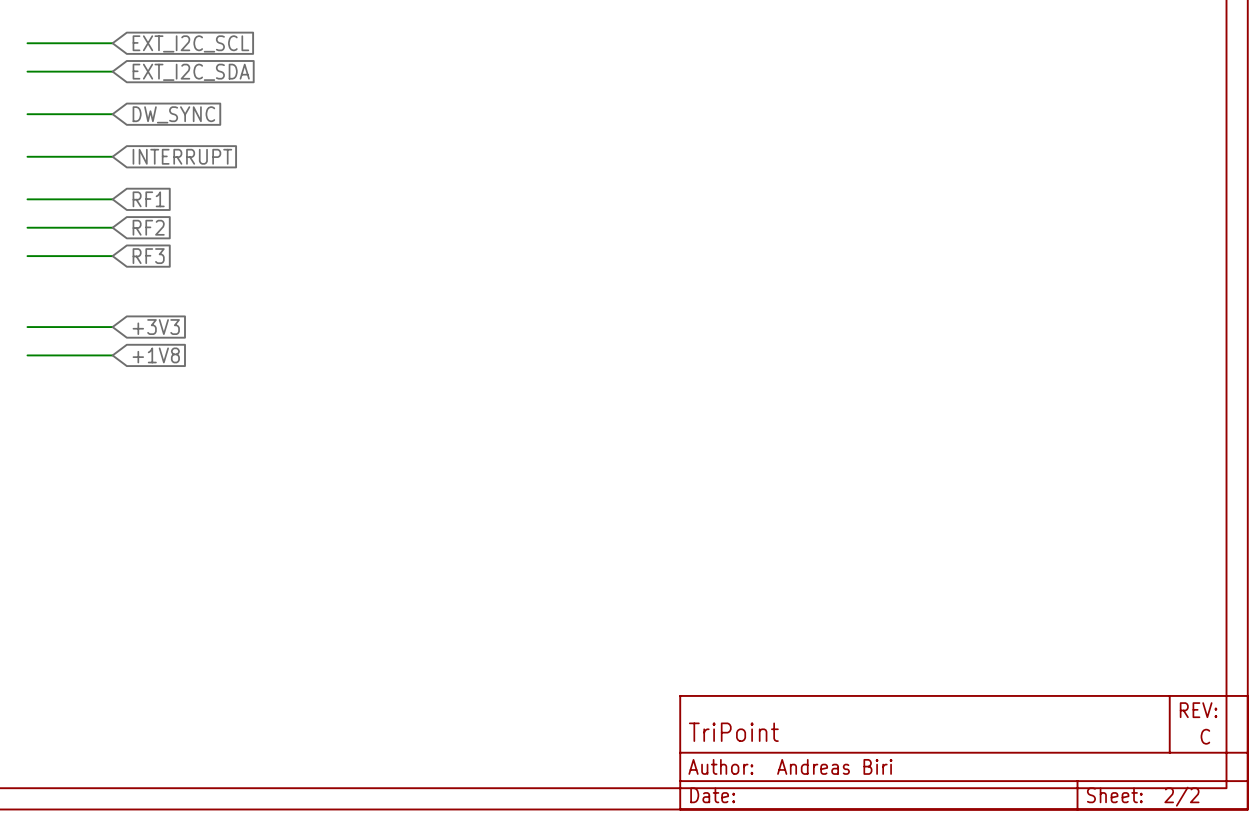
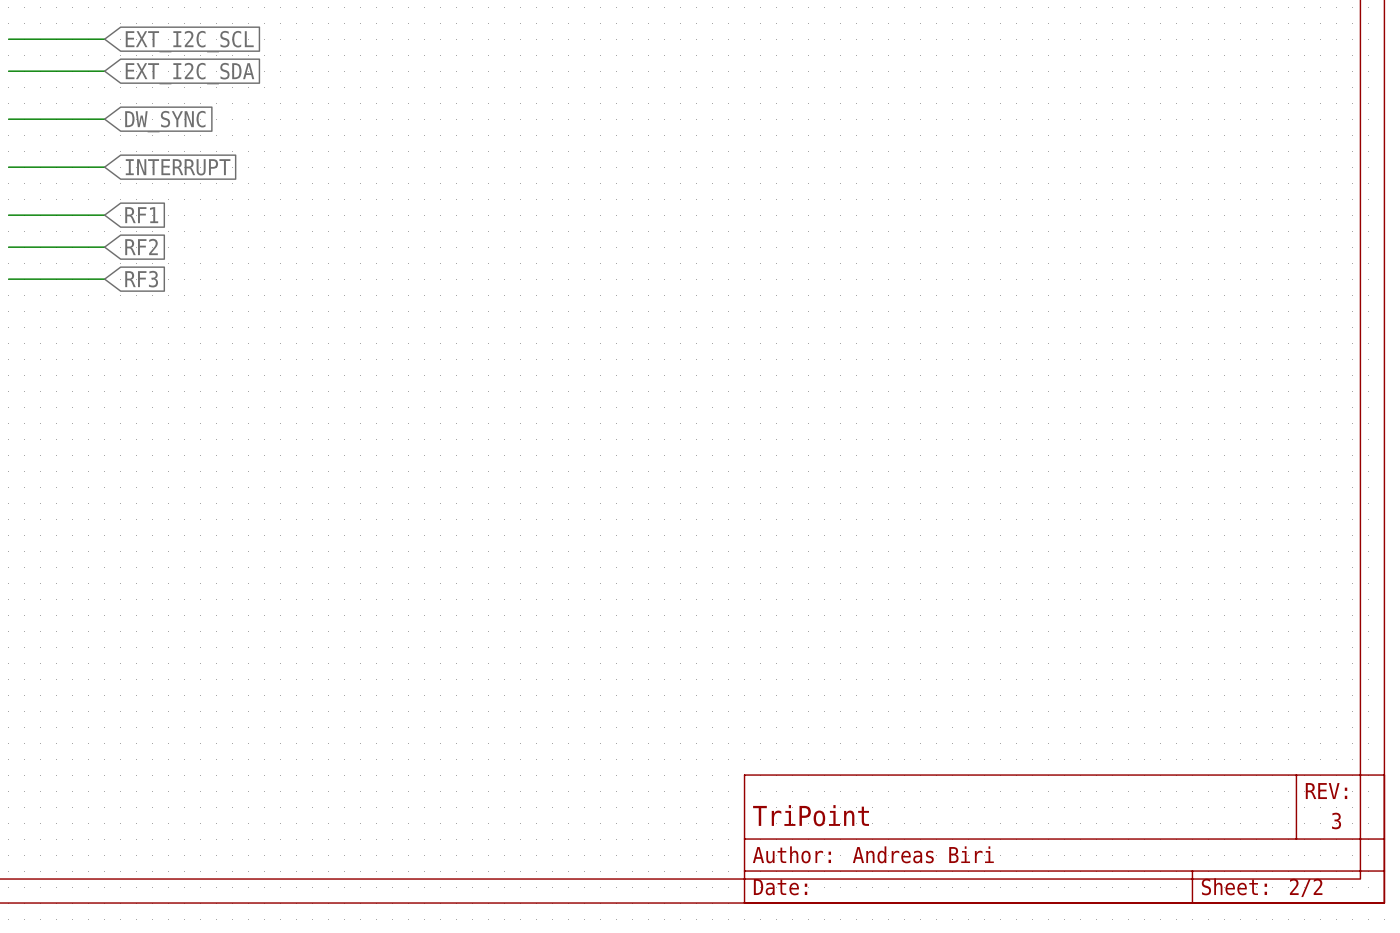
wire: (27, 327) (112, 327) -> none
global label: +3V3 (156, 327) -> none
wire: (27, 355) (112, 355) -> none
global label: +1V8 (156, 355) -> none
part text: C (1205, 736) -> 3 (1336, 820)

